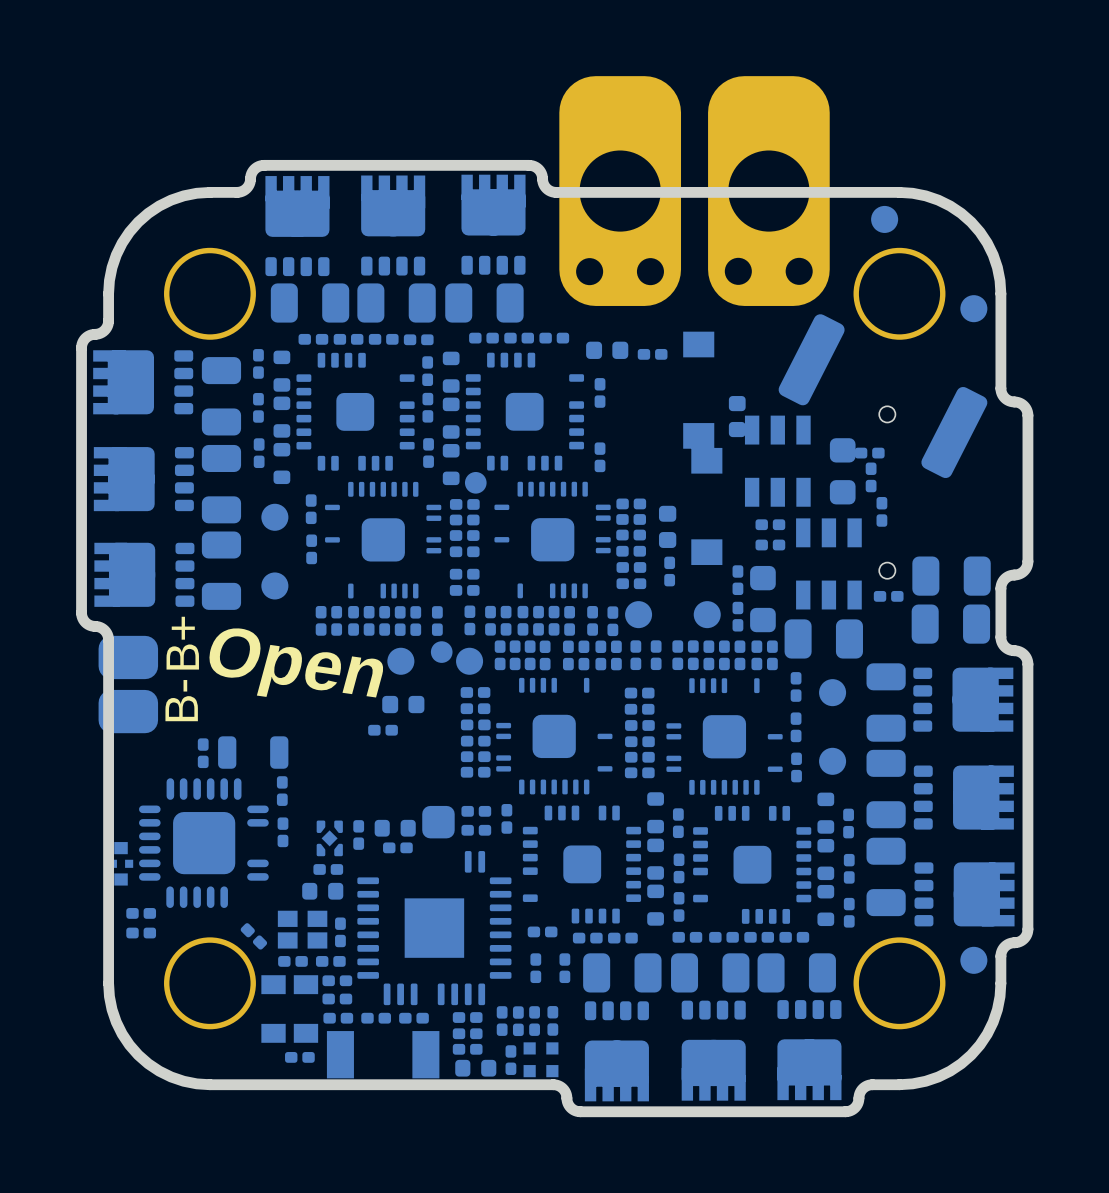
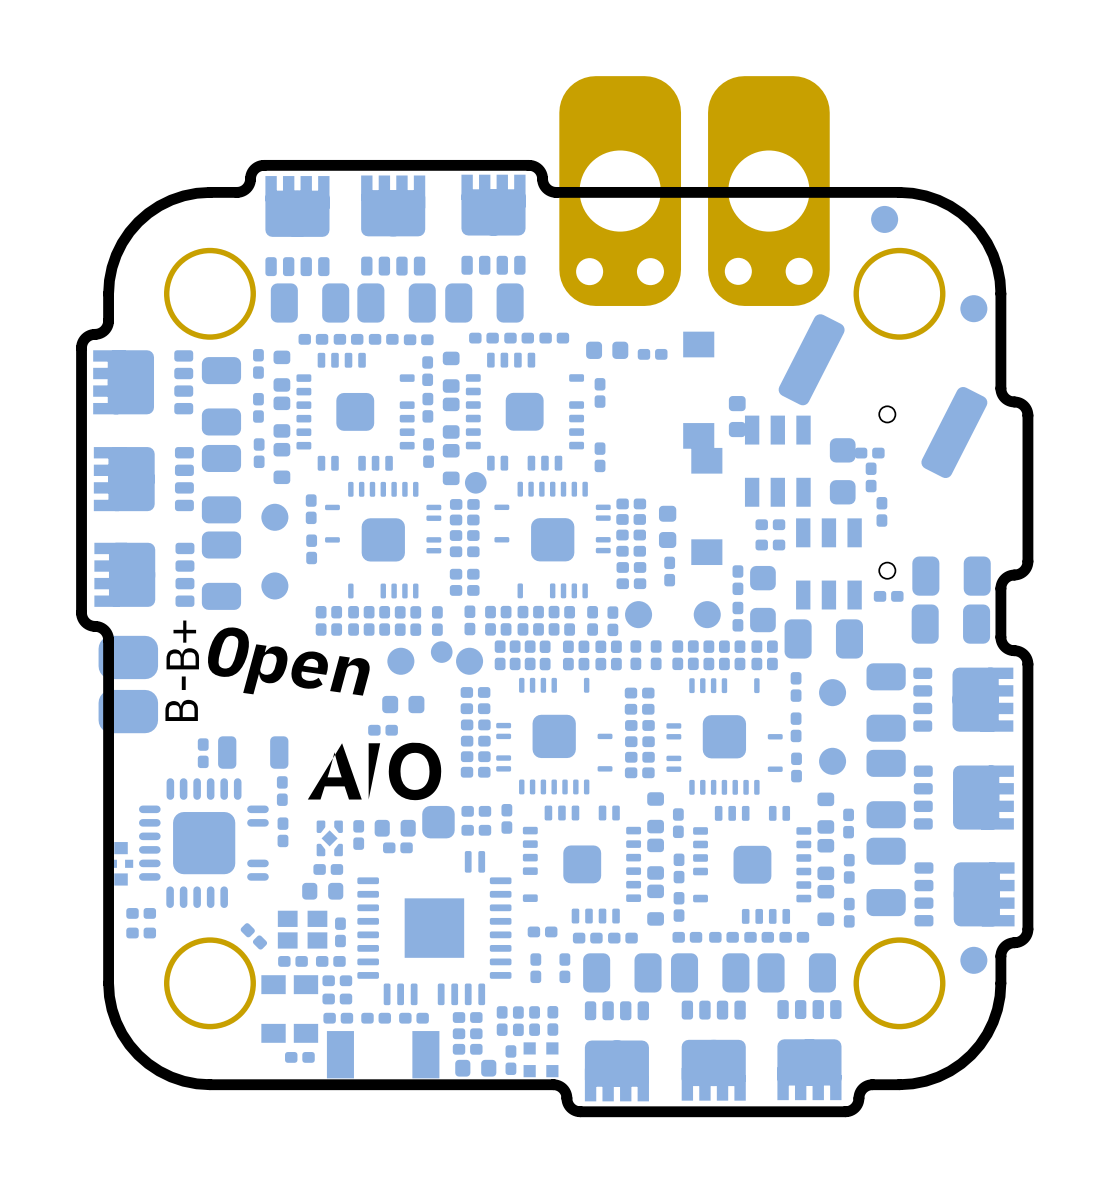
drawing: none -> [307, 742, 442, 801]

